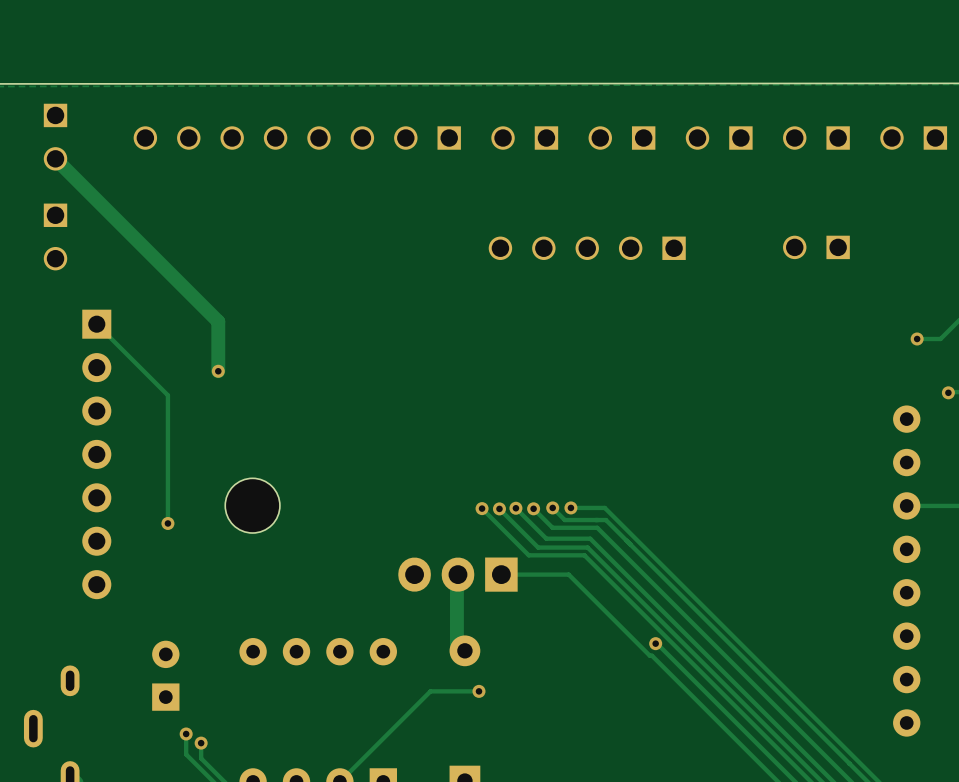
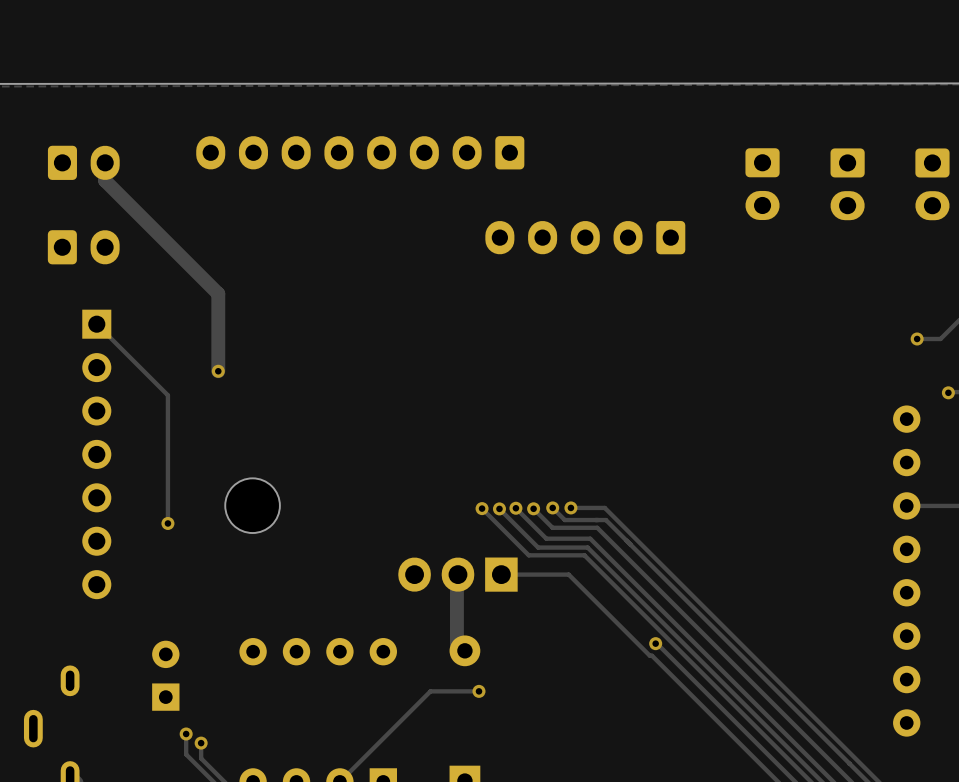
part: (55, 137) -> none
part: (297, 138) -> none
part: (524, 138) -> none
part: (621, 138) -> none
part: (719, 138) -> none
part: (816, 138) -> none
part: (913, 138) -> none
part: none -> (360, 152)
track: (55, 158) (218, 321) -> (105, 162) (105, 180) (218, 293) (218, 321)
part: none -> (83, 162)
part: none -> (762, 184)
part: none -> (847, 184)
part: none -> (932, 184)
part: (55, 236) -> none
part footprint: [488, 236, 686, 260] -> [485, 220, 686, 255]
part: none -> (83, 247)
part: (816, 247) -> none

